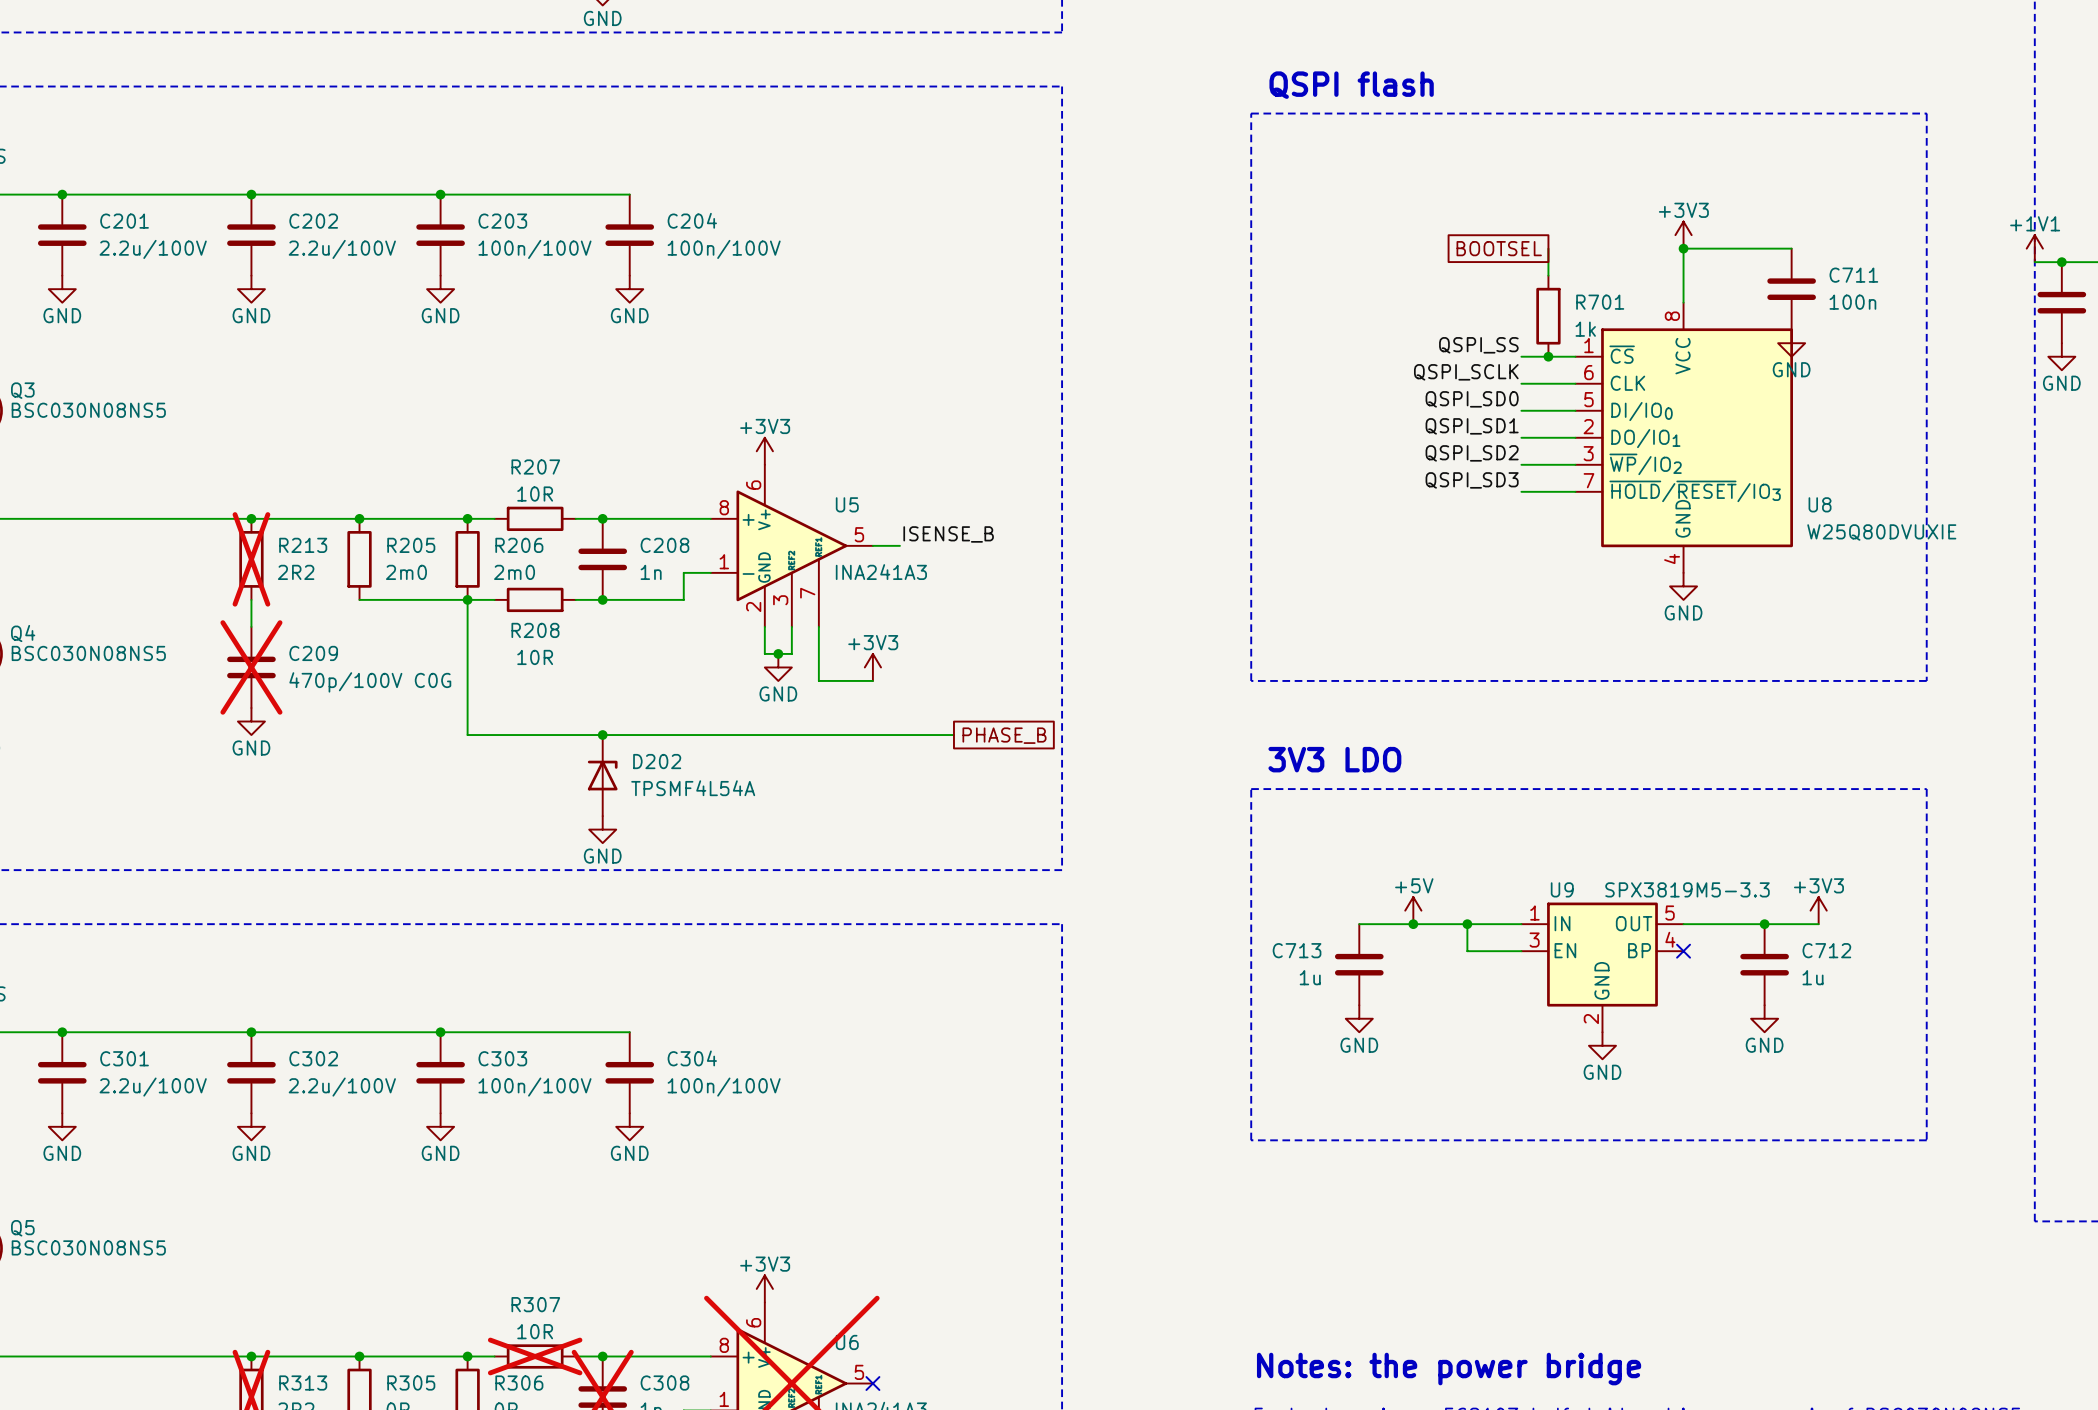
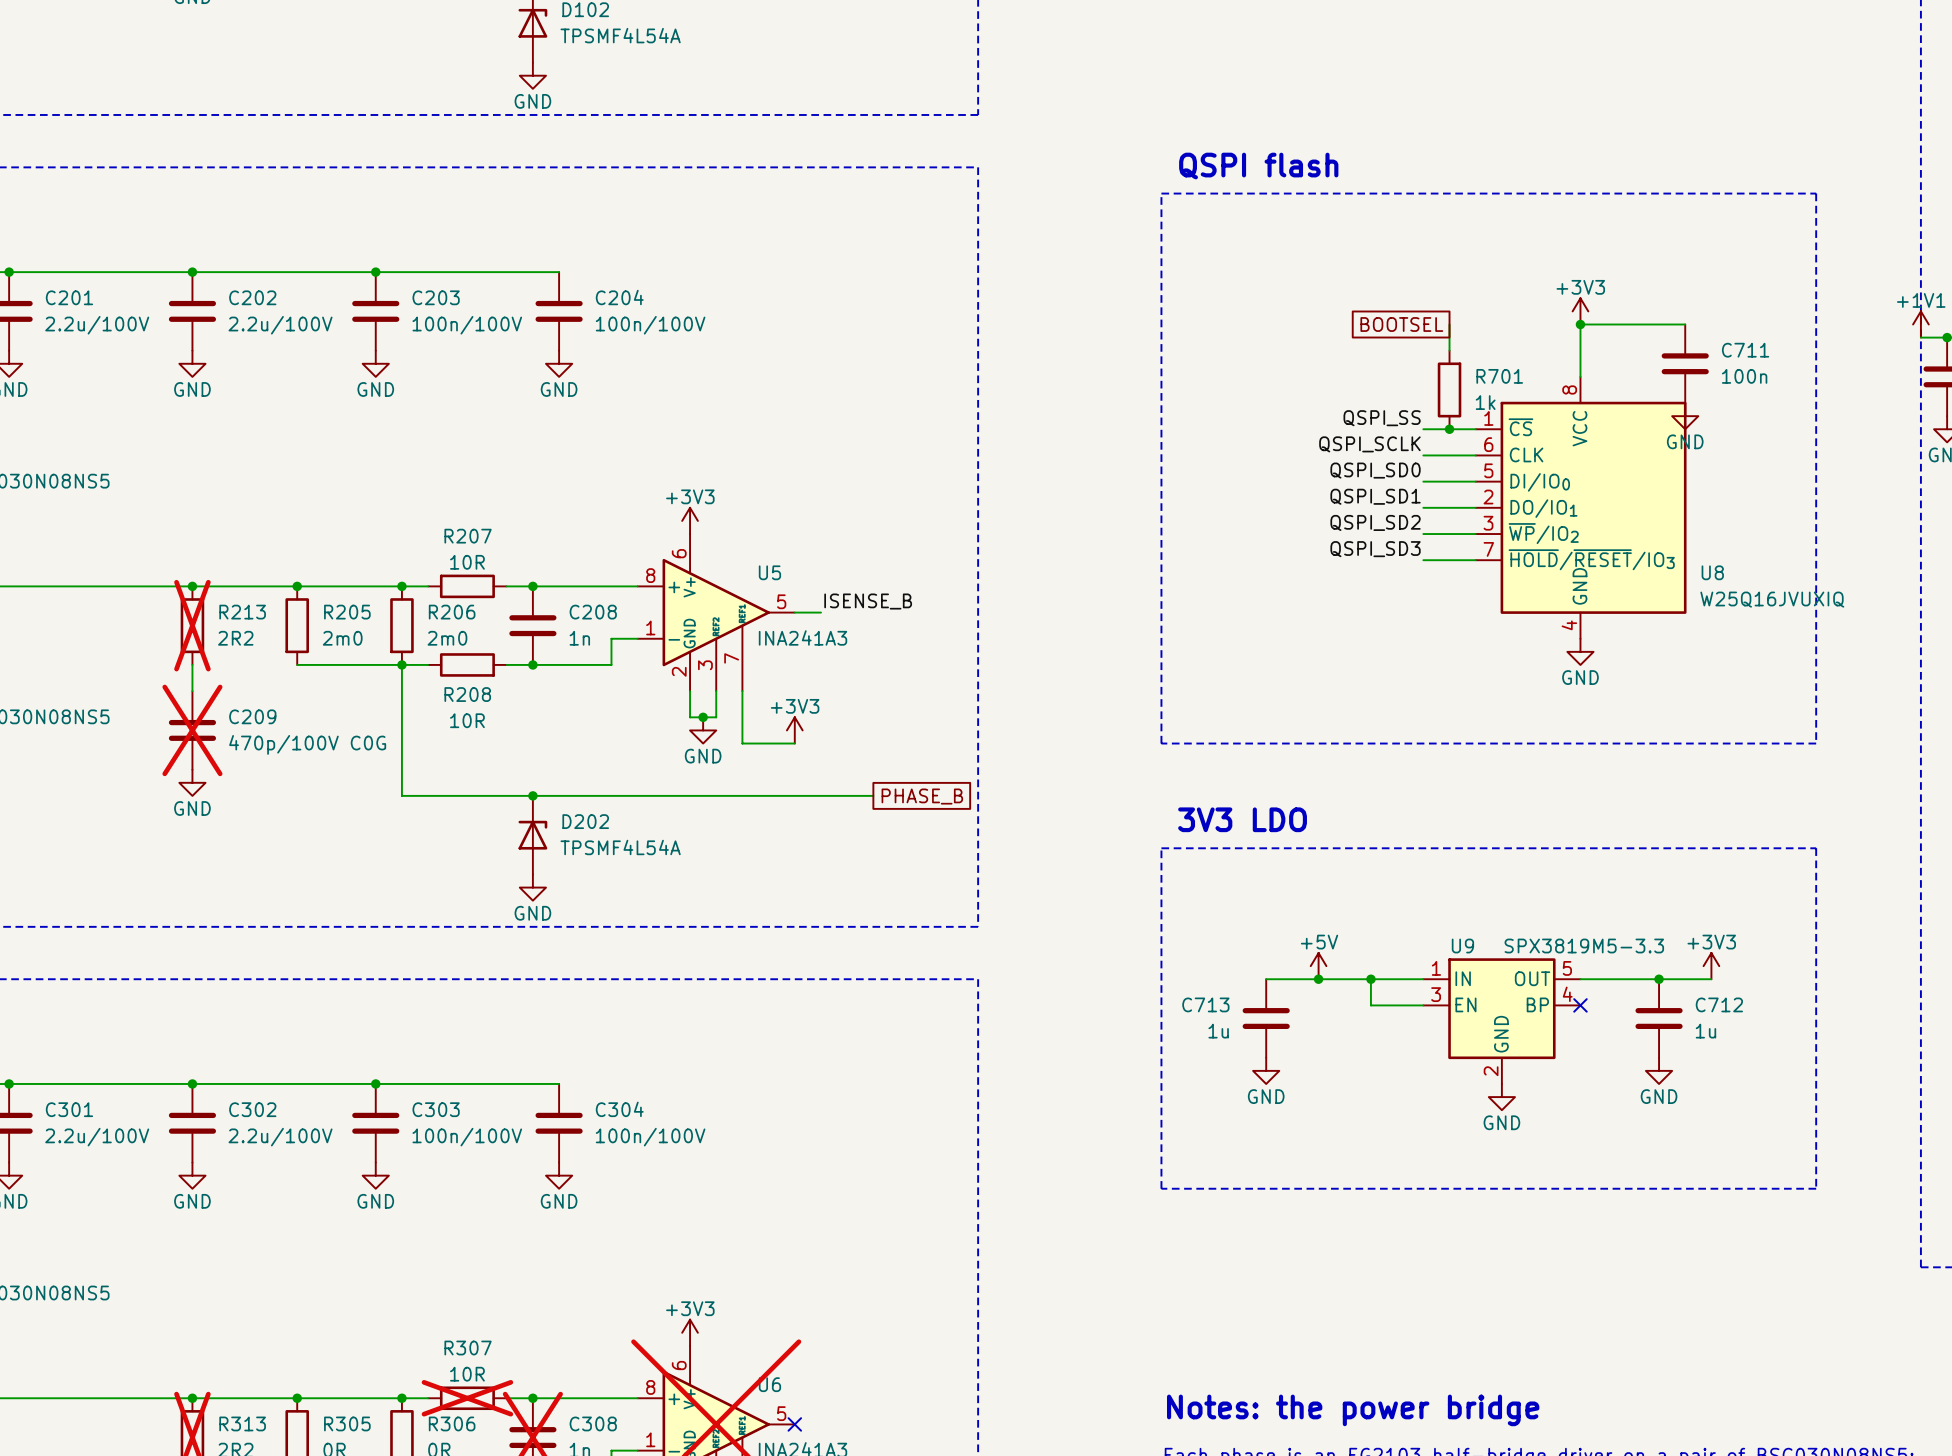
U8 value: W25Q80DVUXIE (1881, 532) -> W25Q16JVUXIQ (1772, 599)

